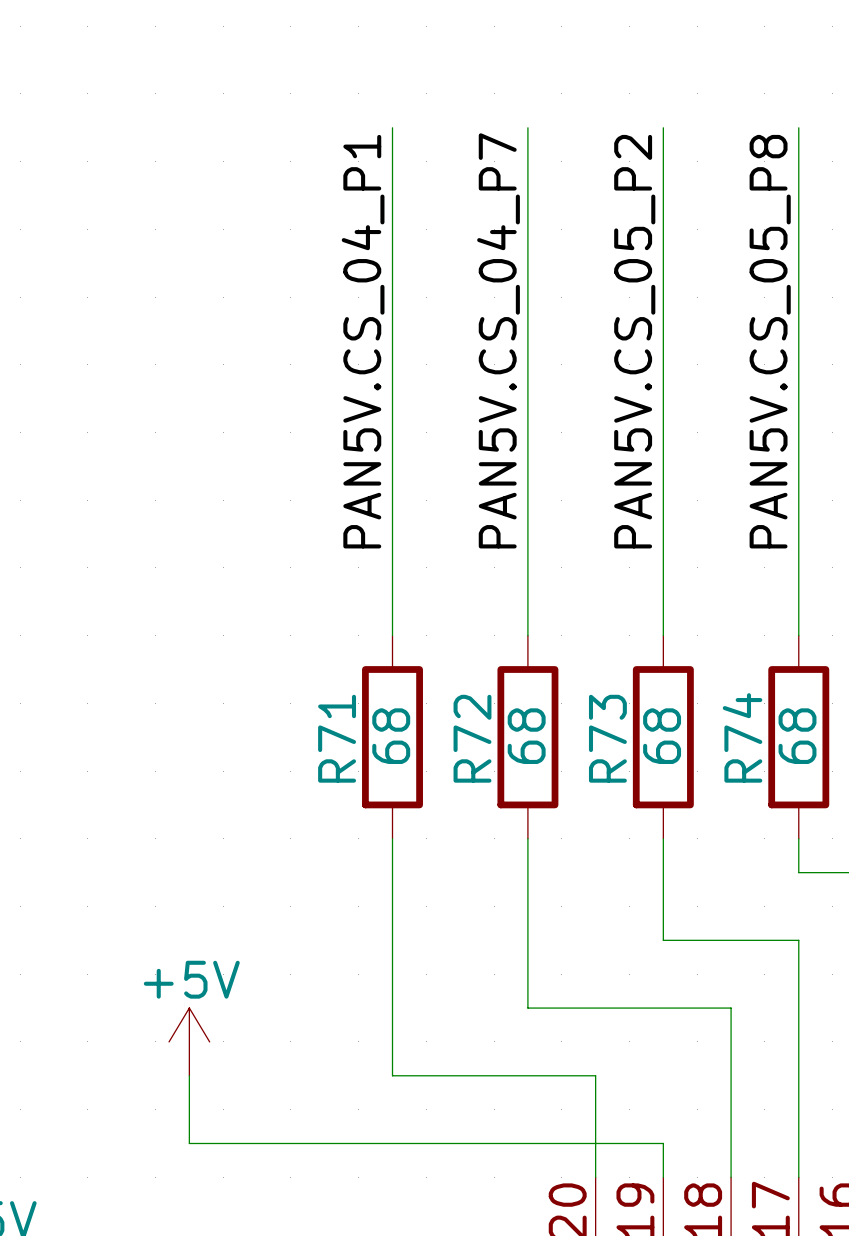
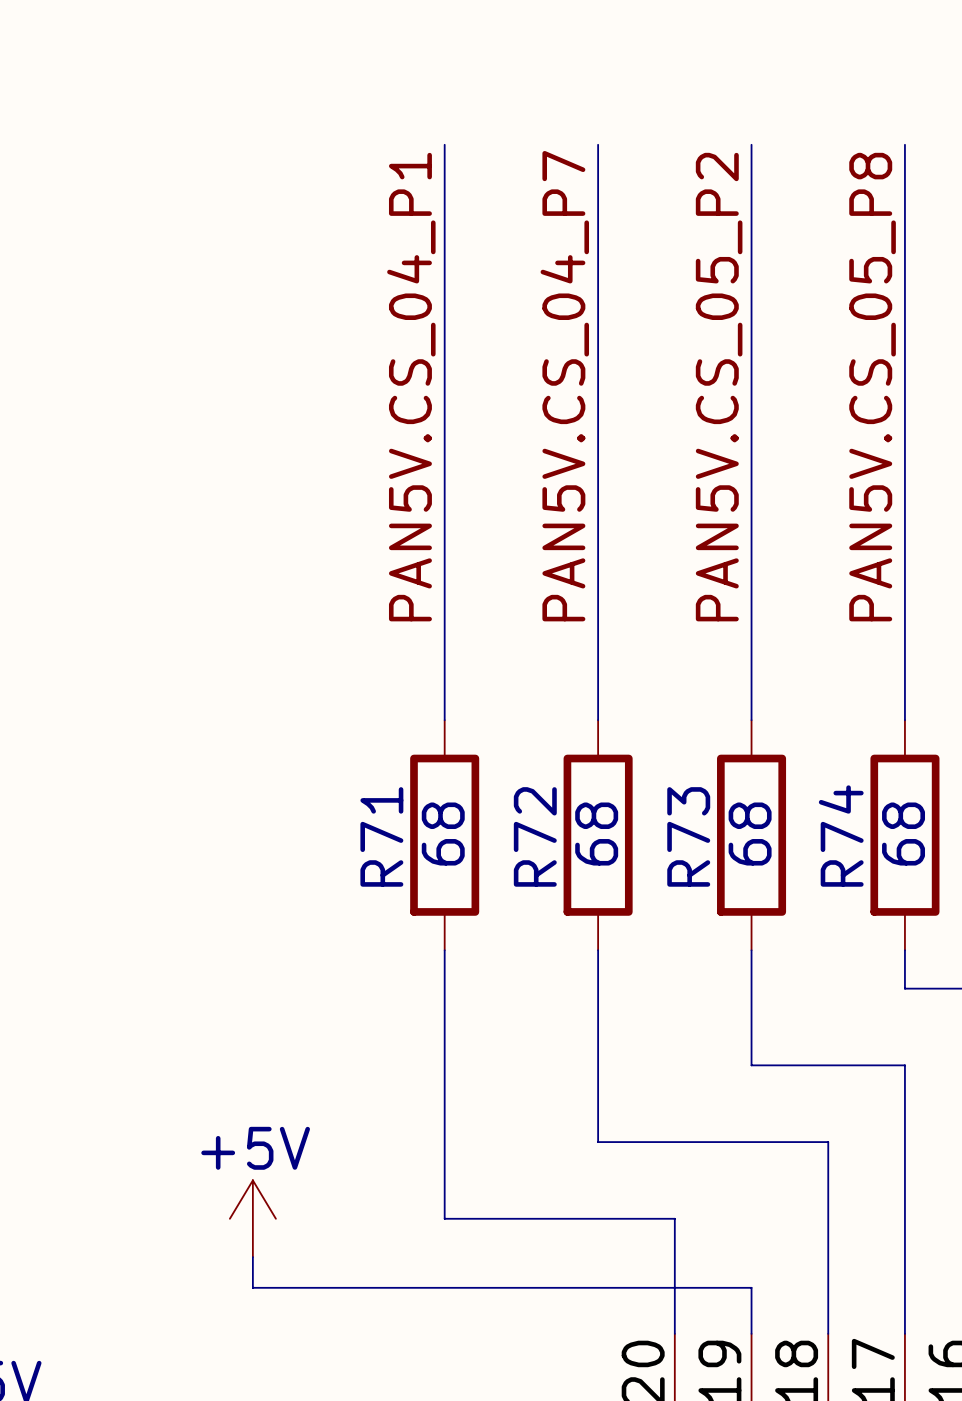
power symbol position: +5V (189, 1041) -> +5V (252, 1218)
wire: (189, 1075) (189, 1143) (663, 1143) -> (252, 1257) (252, 1287) (751, 1287) (751, 1295)

